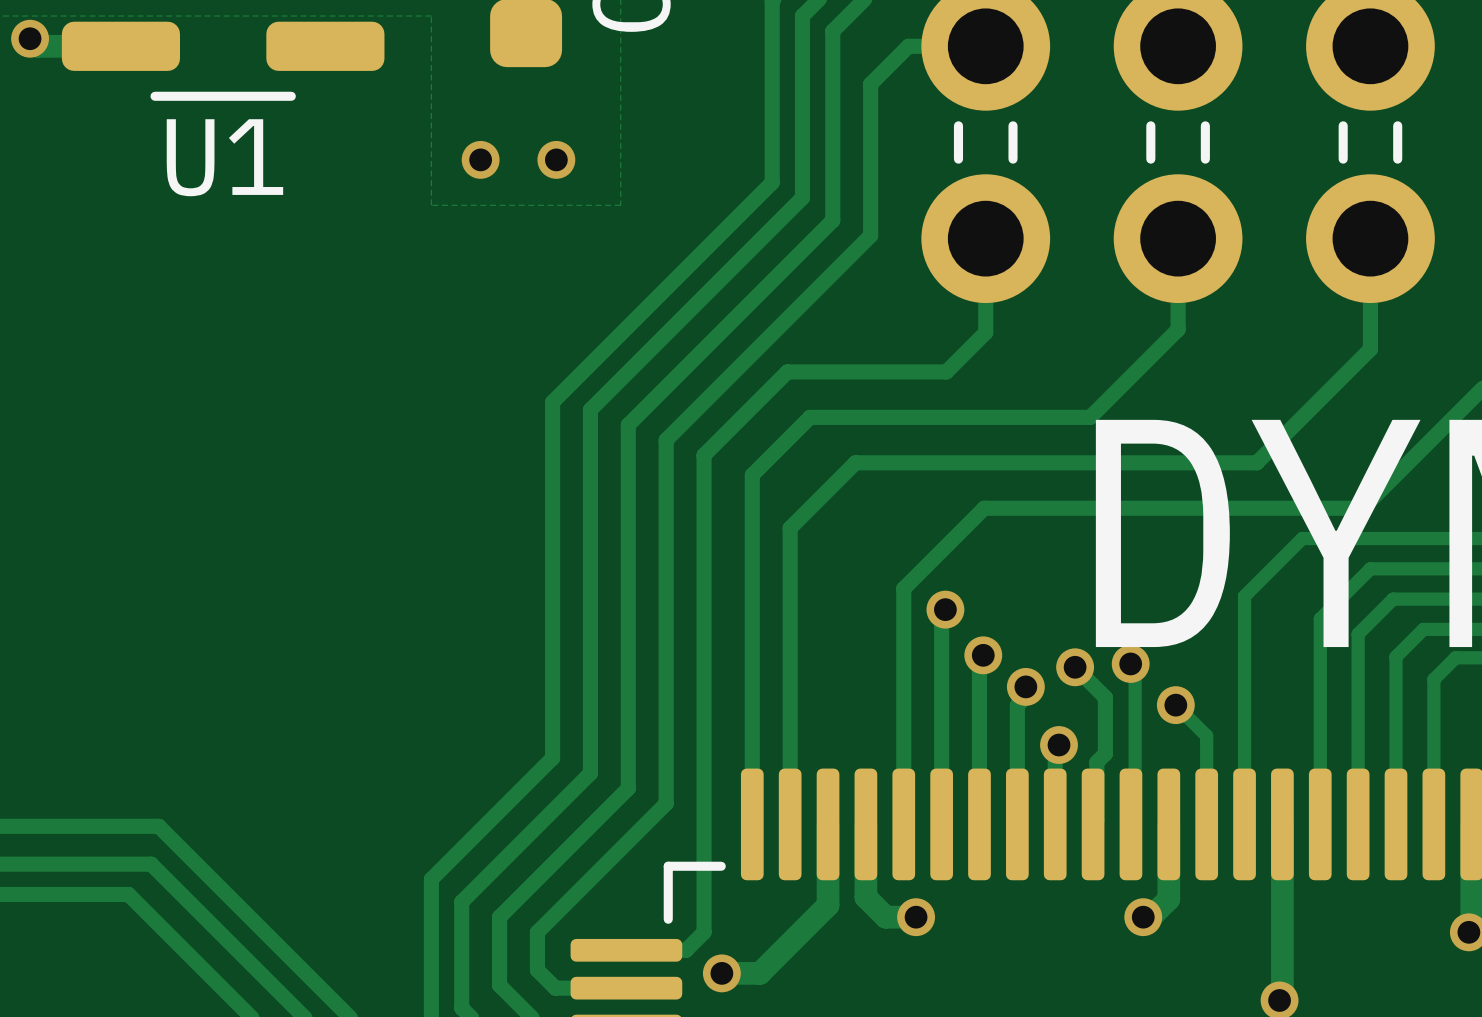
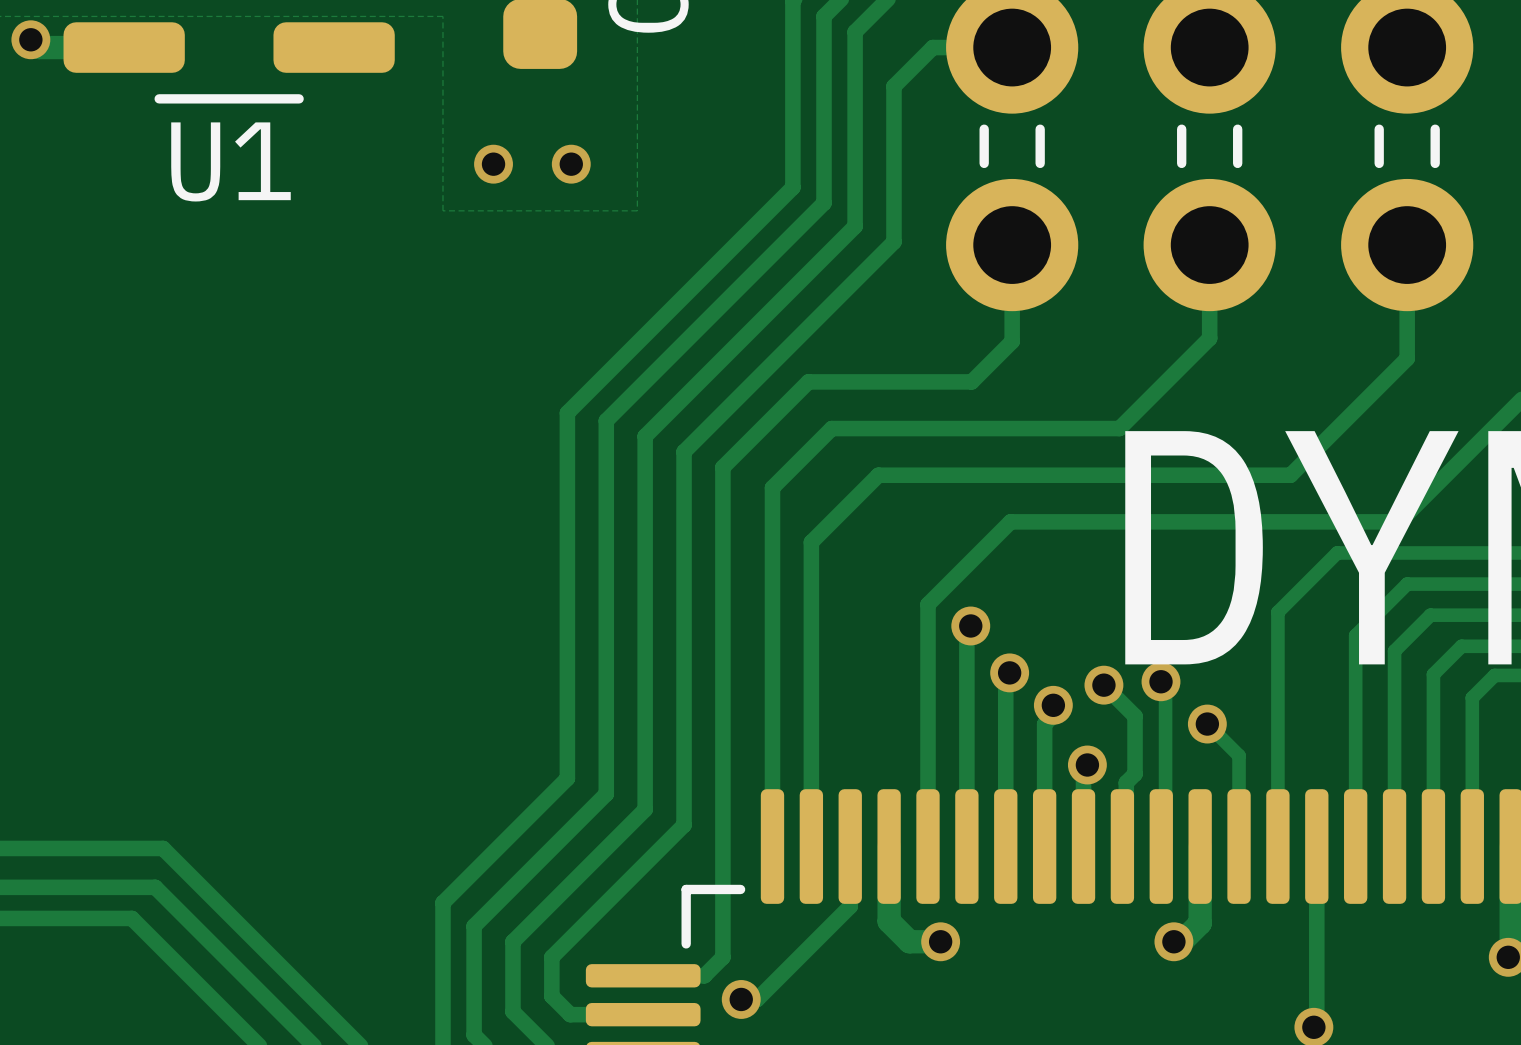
track width: thick (1282, 824) (1282, 997) (1279, 1000) -> thin (1316, 846) (1316, 1024) (1313, 1027)
track: (828, 882) (828, 905) (759, 973) (737, 973) -> (850, 906) (757, 999)

